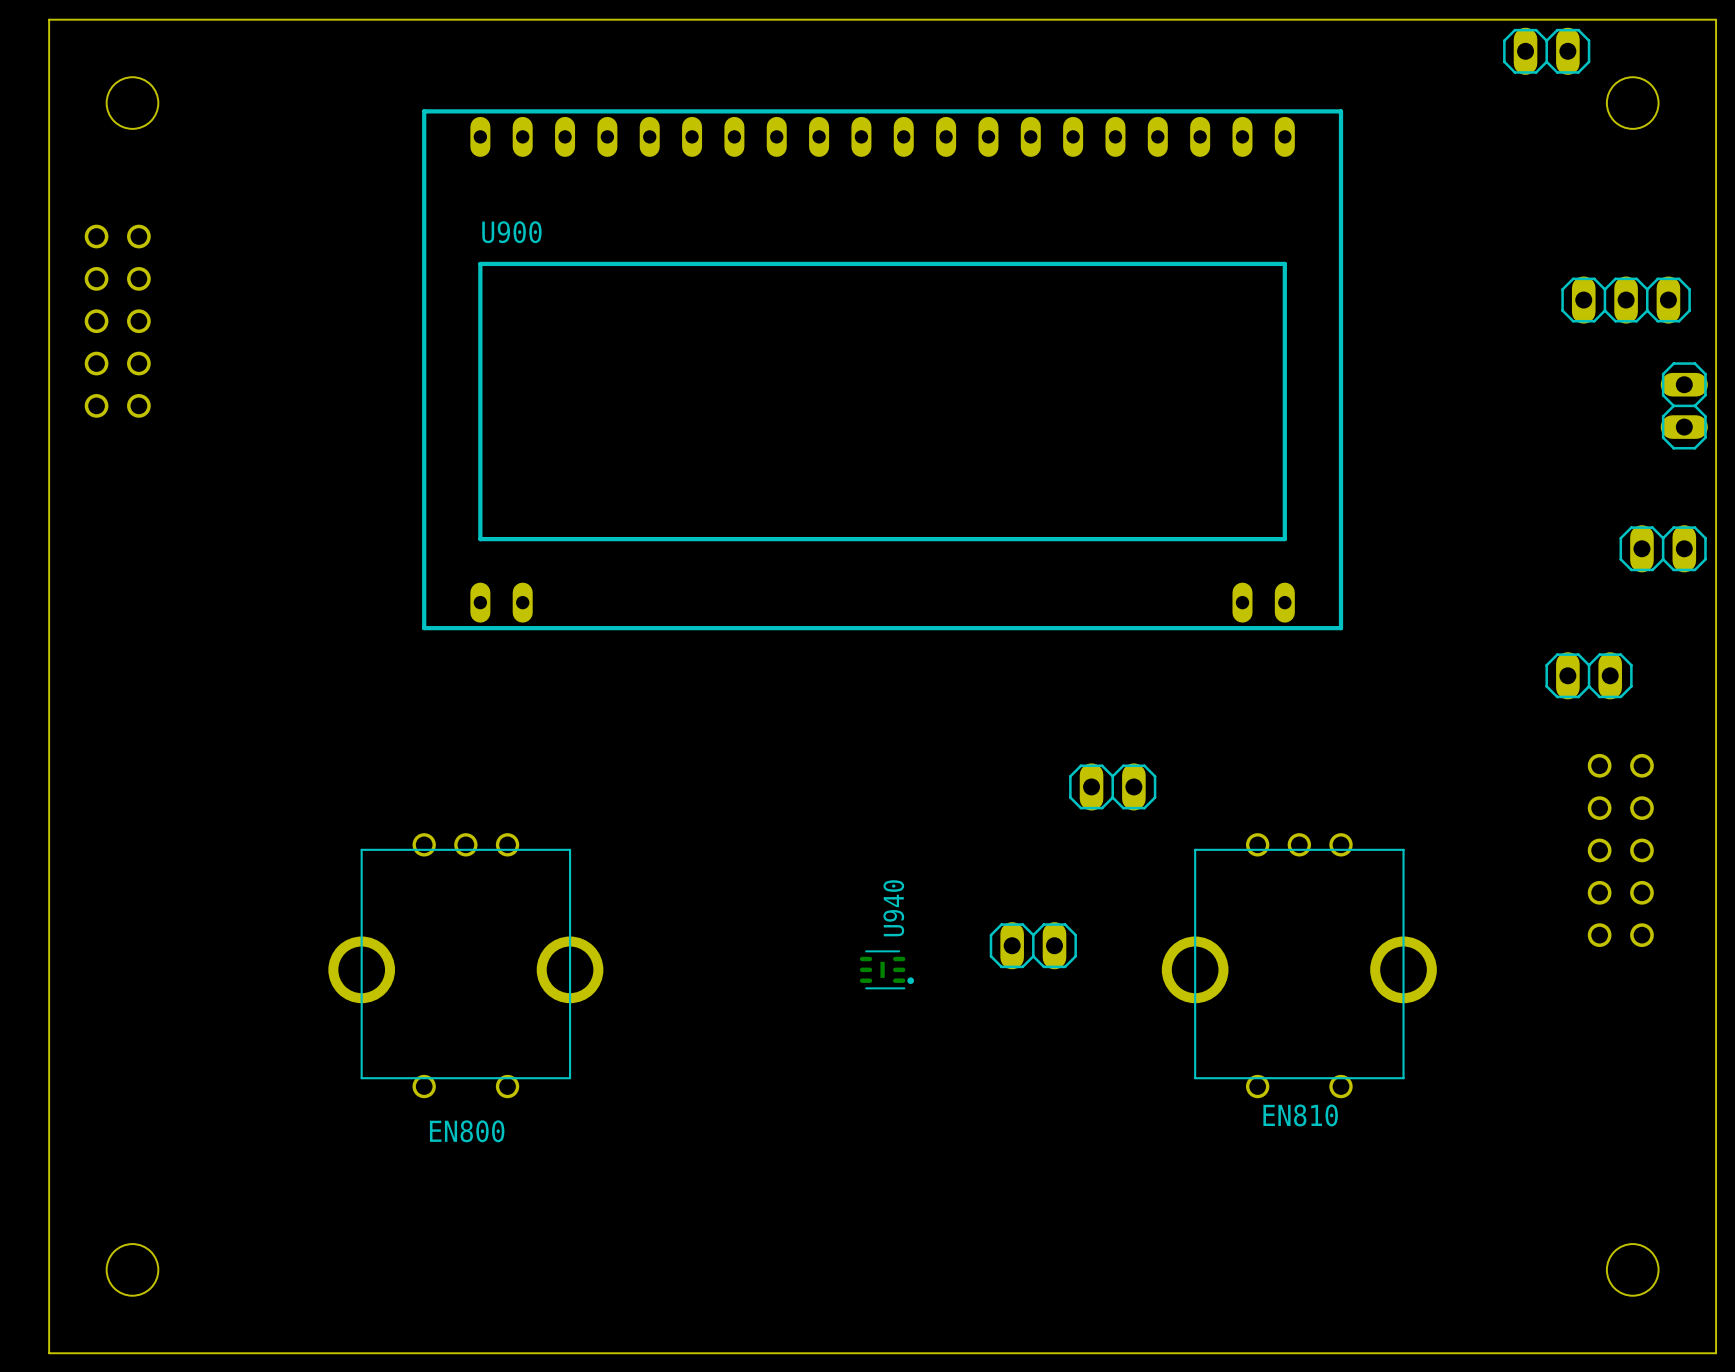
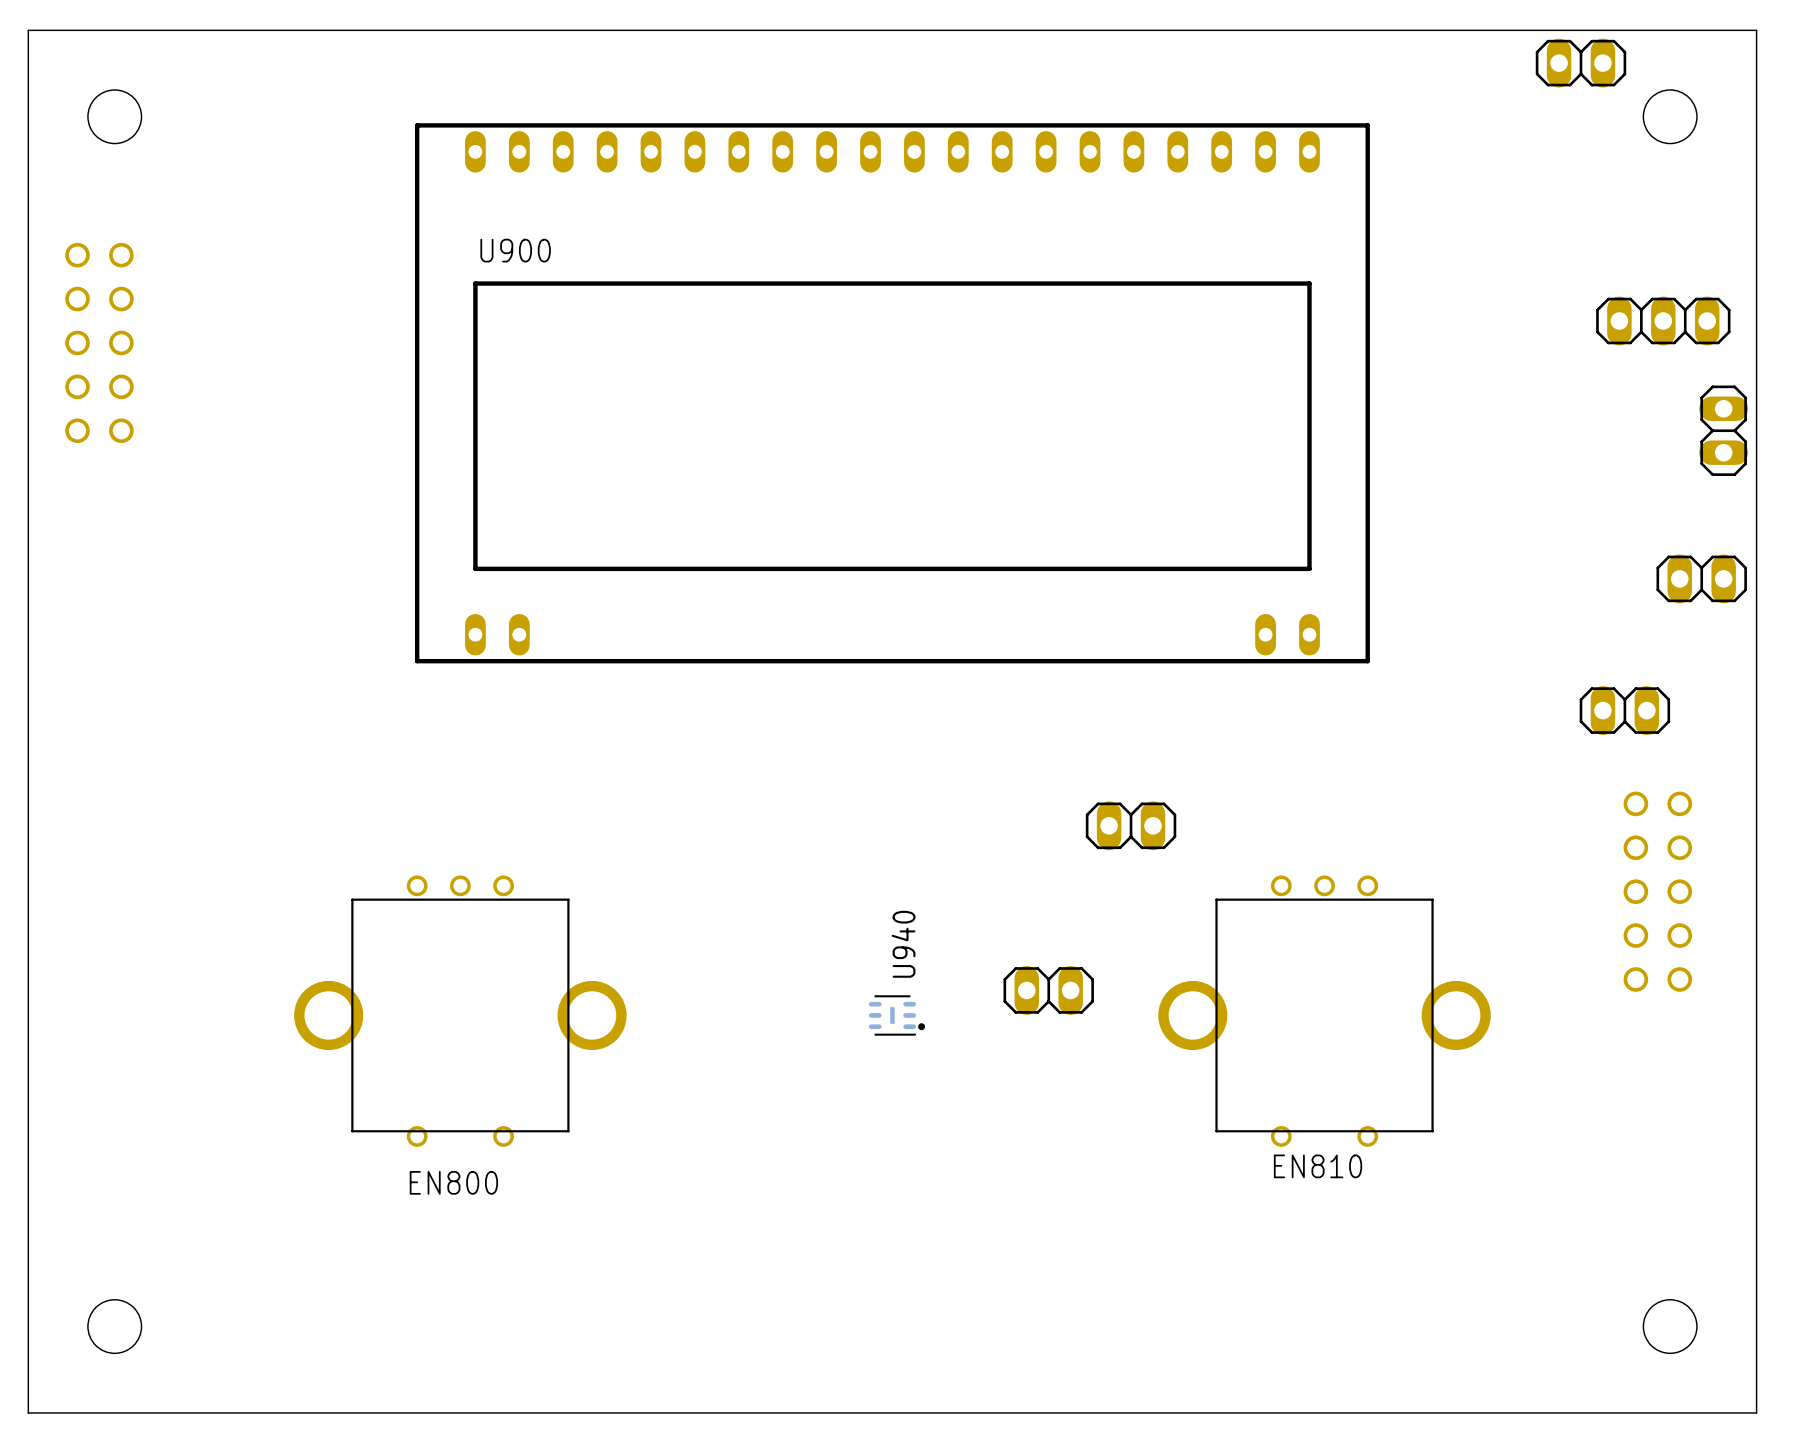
EN800 footprint: [328, 833, 604, 1099] -> [294, 875, 627, 1147]
EN810 footprint: [1161, 833, 1437, 1099] -> [1158, 875, 1491, 1147]

